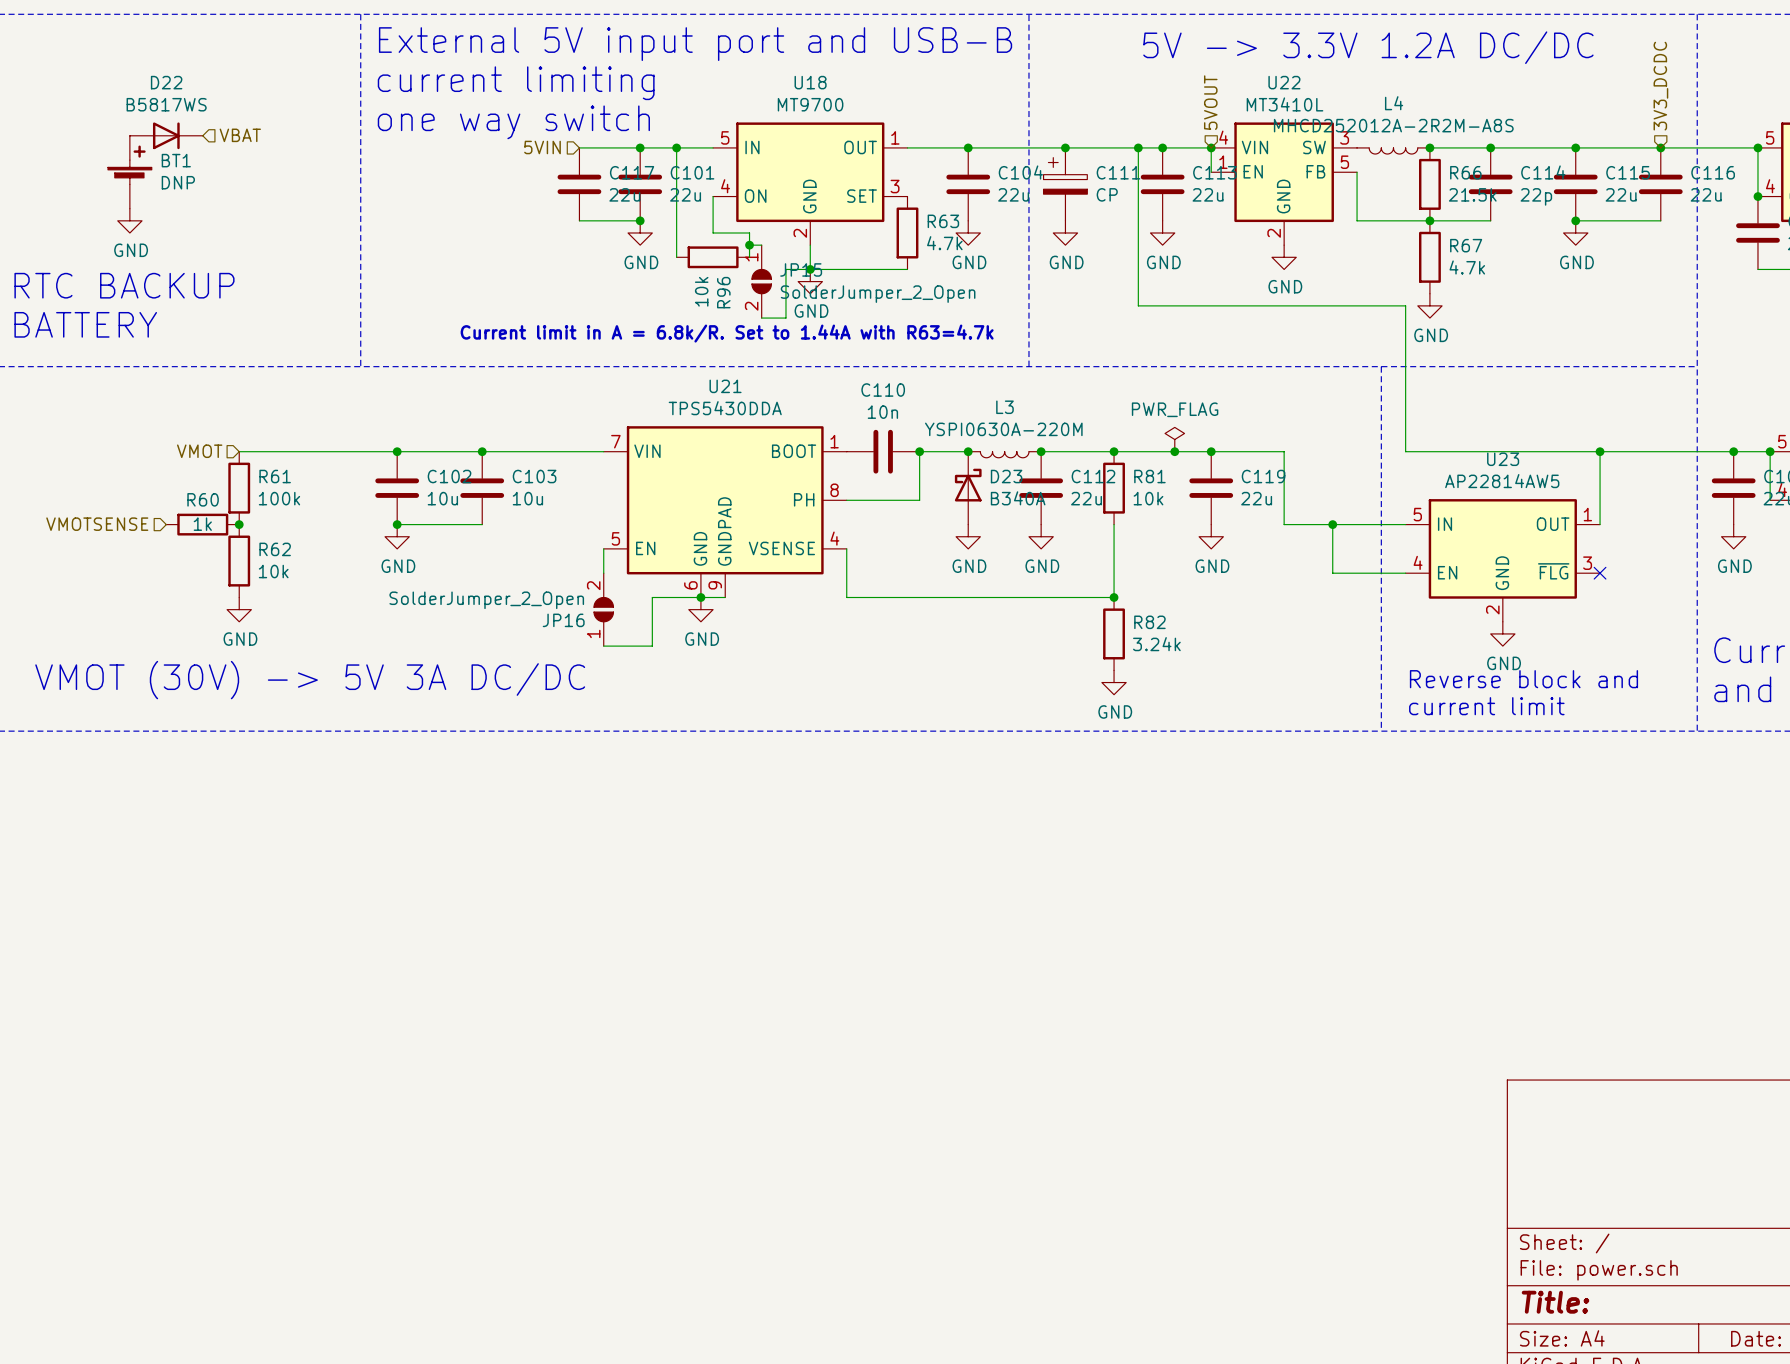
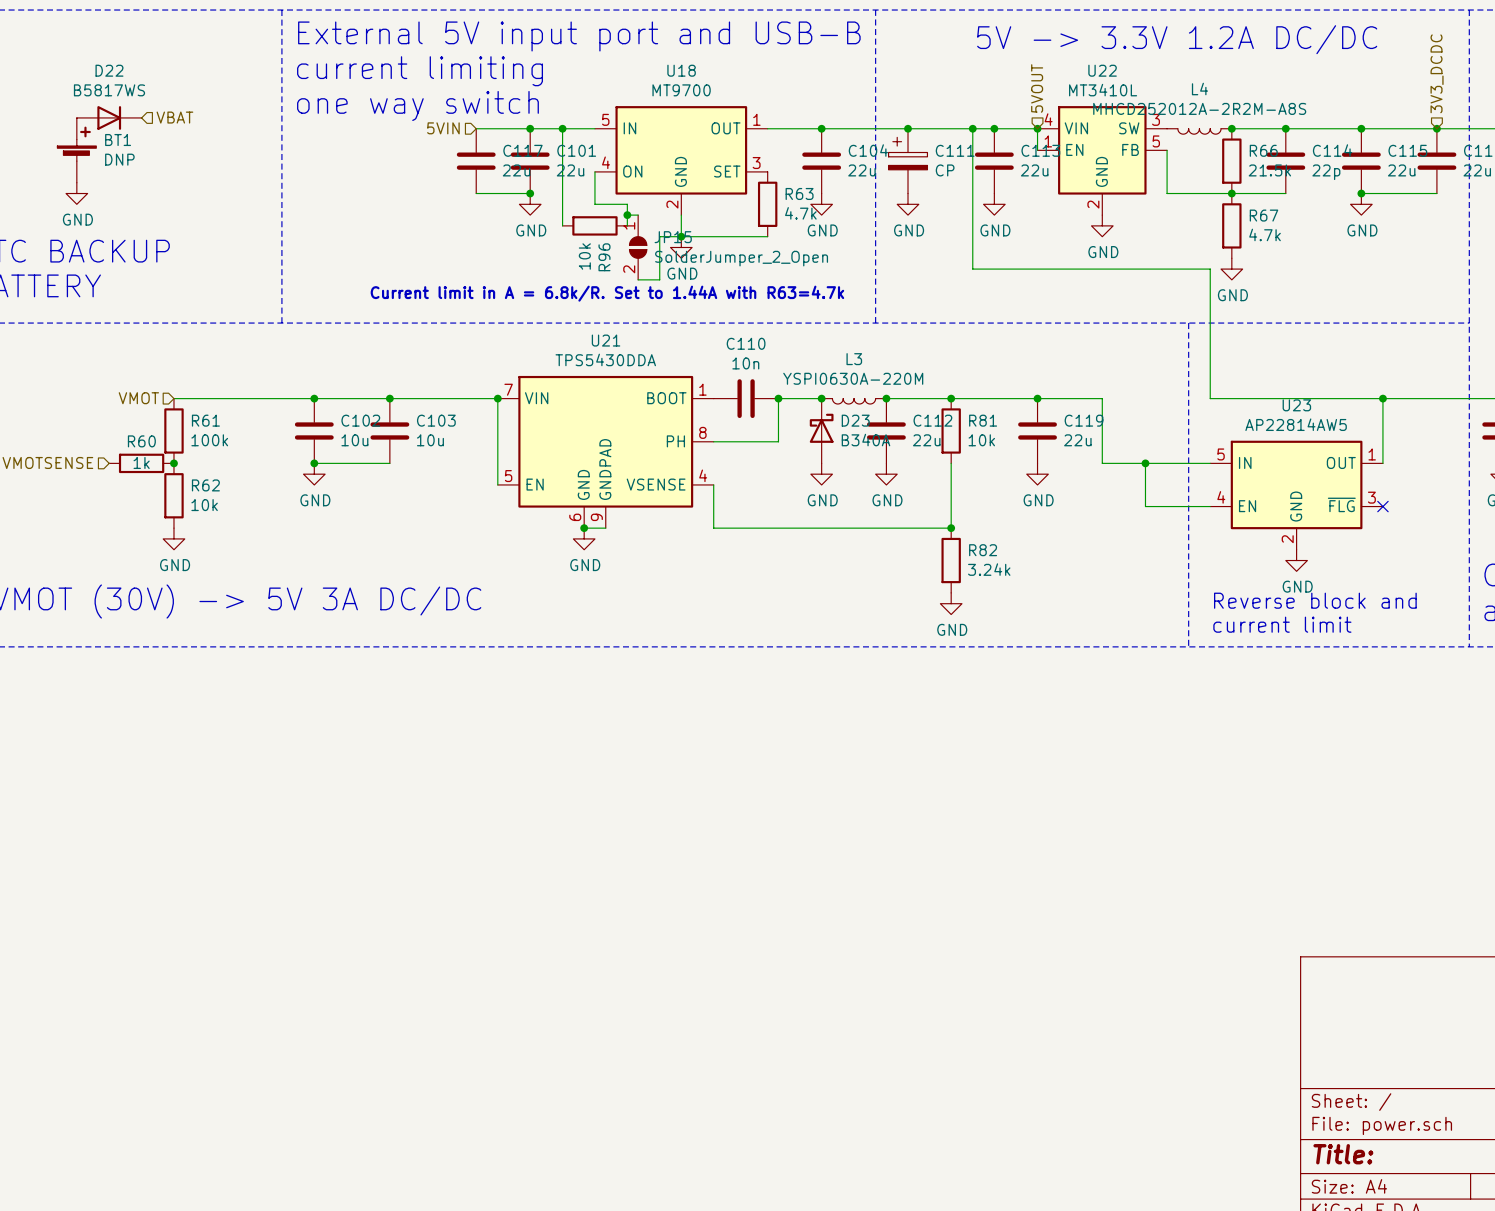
power symbol: PWR_FLAG (1174, 439) -> none
junction: none -> (497, 398)
junction: (1174, 451) -> none
wire: (603, 548) (603, 573) -> (497, 484) (497, 398)
wire: (700, 597) (652, 597) (652, 646) (603, 646) -> none
JP16: SolderJumper_2_Open (603, 609) -> none

